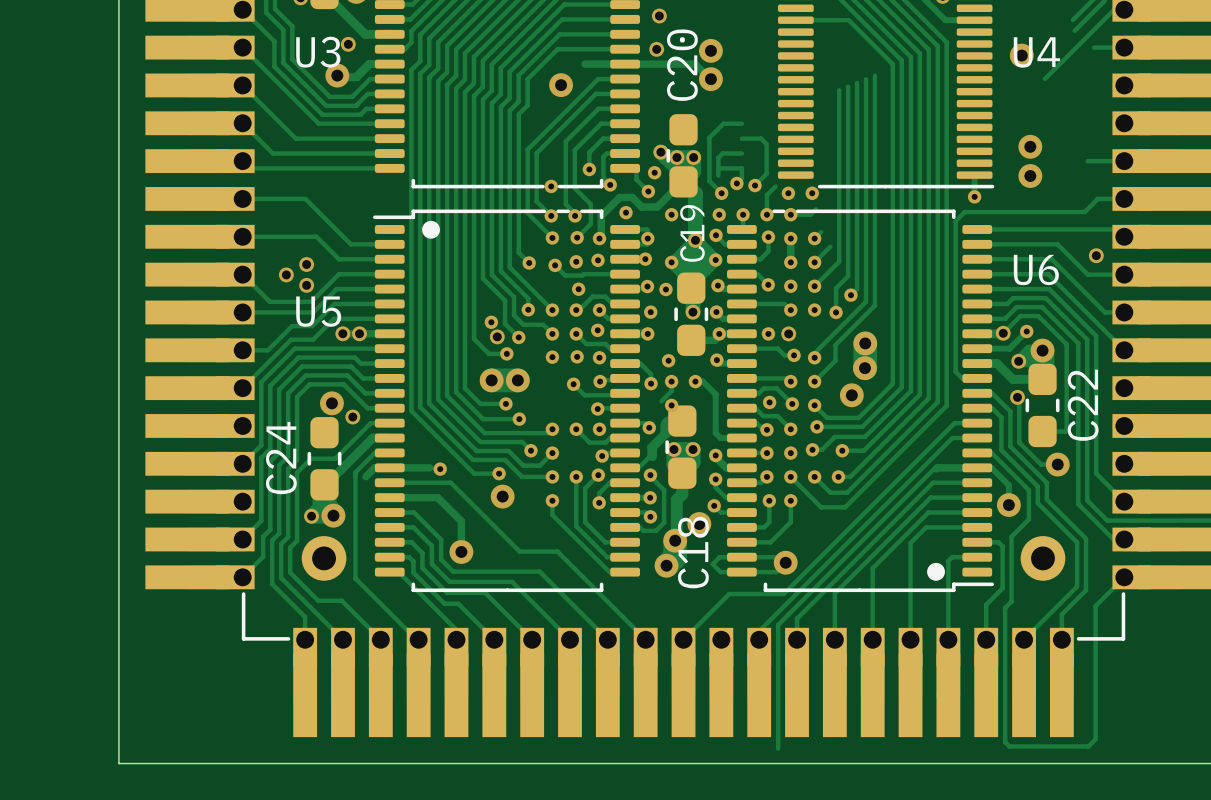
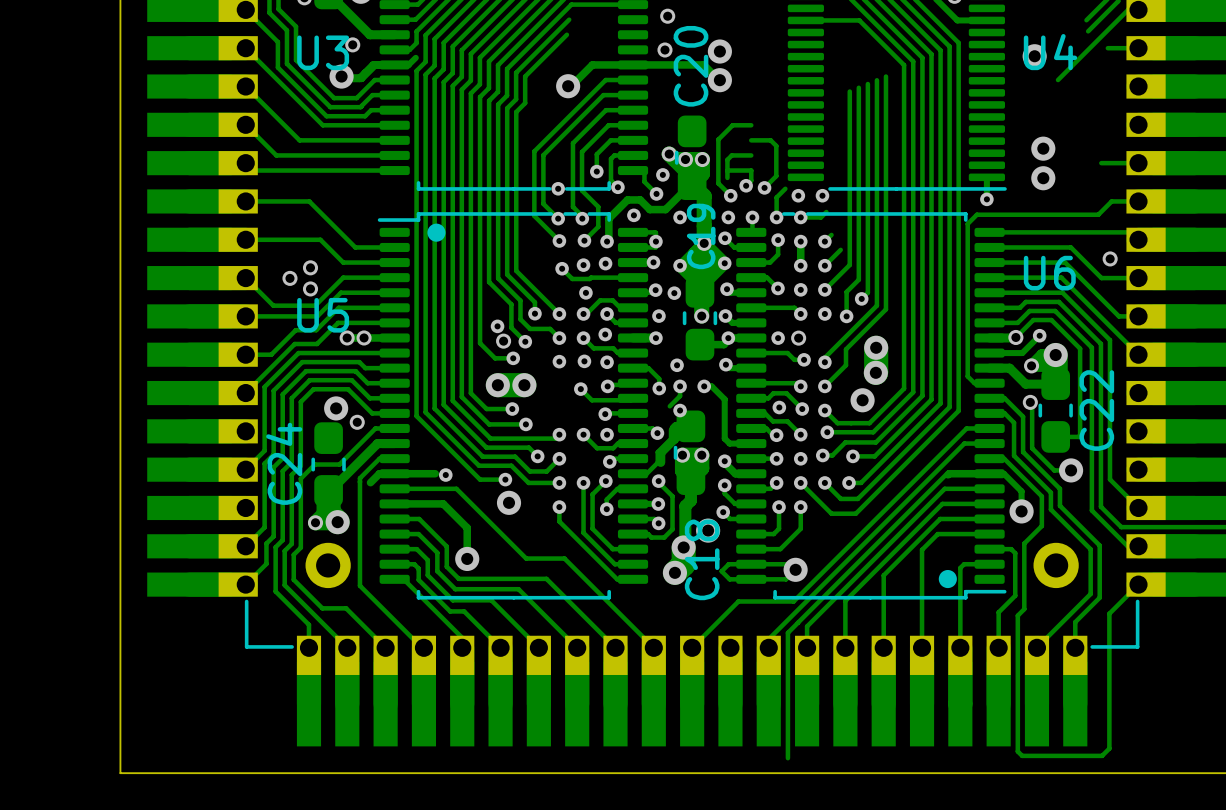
track: (625, 19) (562, 19) -> none
track: (625, 34) (559, 34) -> none
track: (625, 49) (557, 49) (527, 79) (527, 105) (518, 114) (518, 252) (529, 263) -> none
track: none -> (415, 57) (408, 64)
track: none -> (592, 64) (568, 89)
via: (529, 263) -> none

